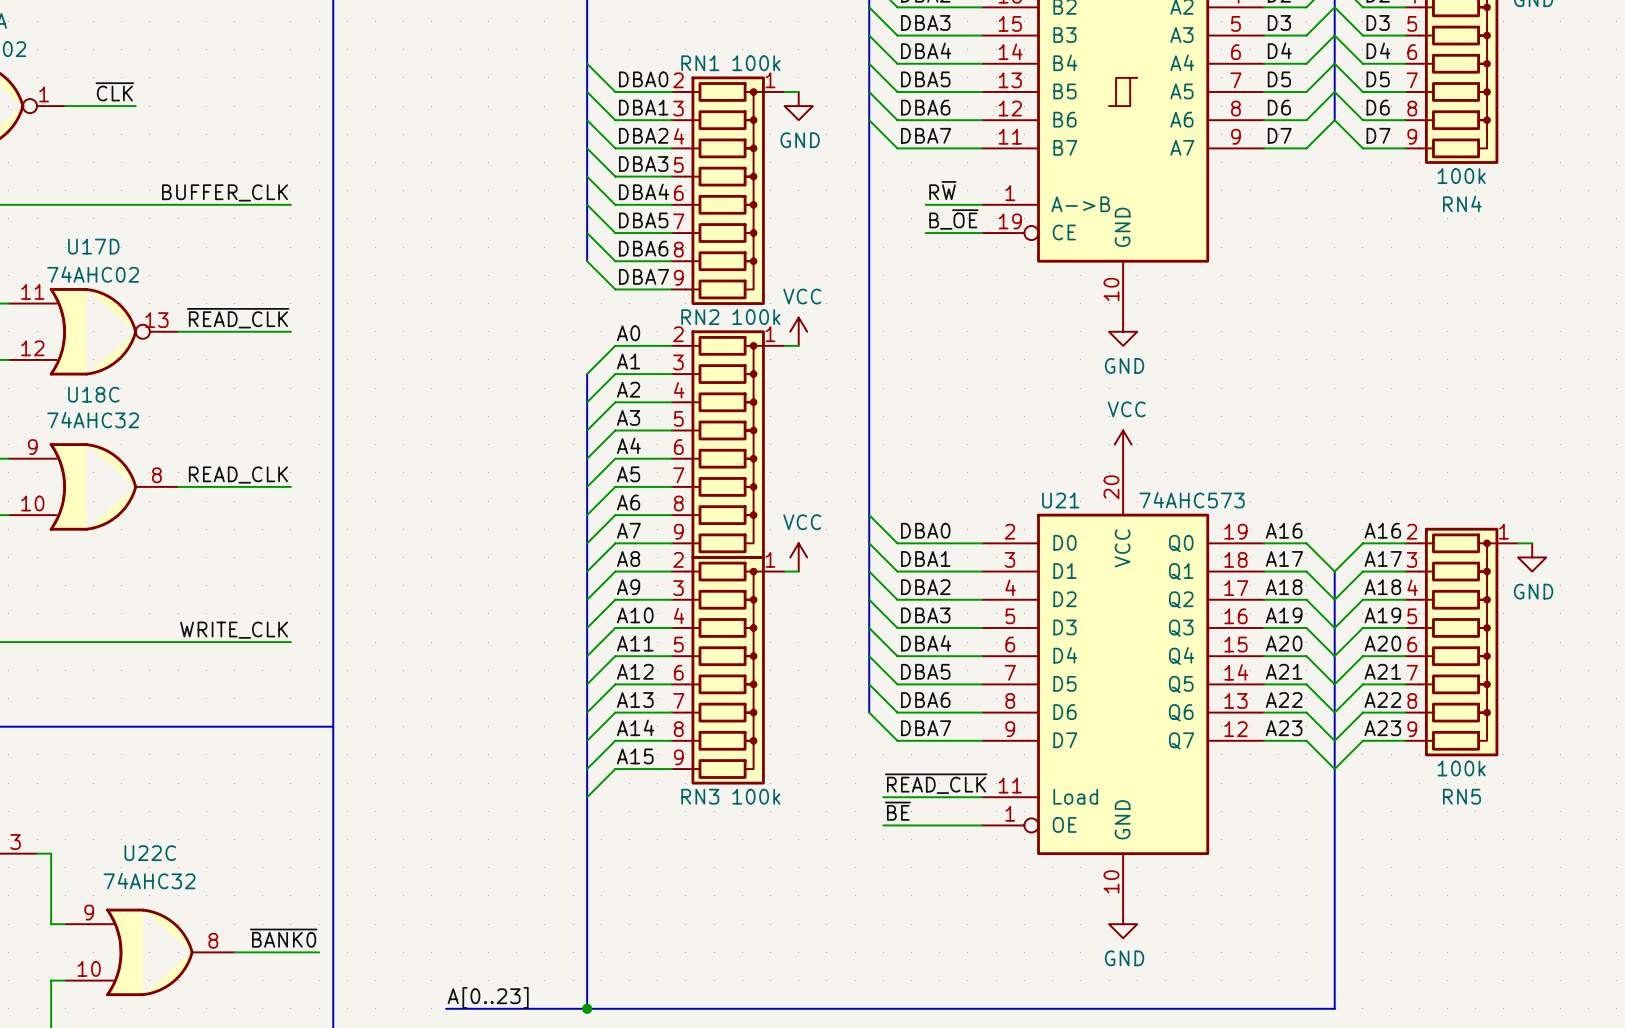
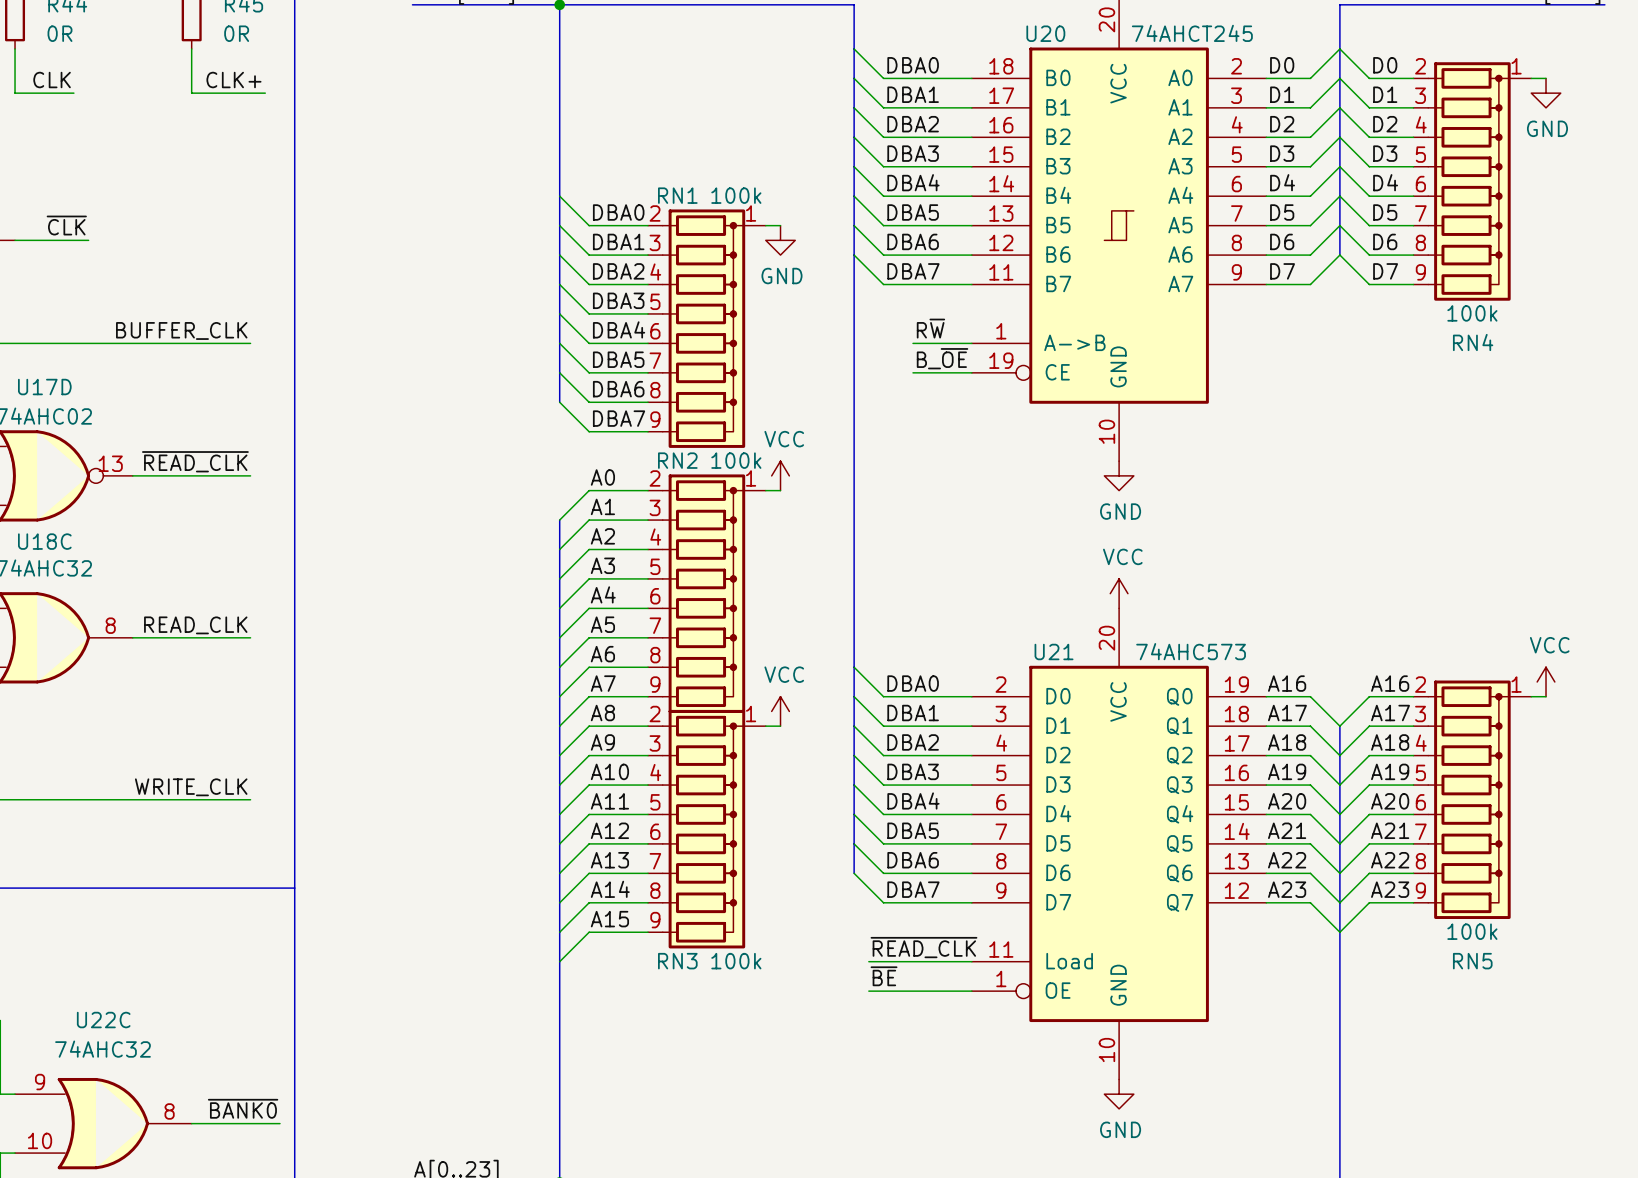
power symbol: none -> VCC (1546, 681)
power symbol: GND (1532, 557) -> none

